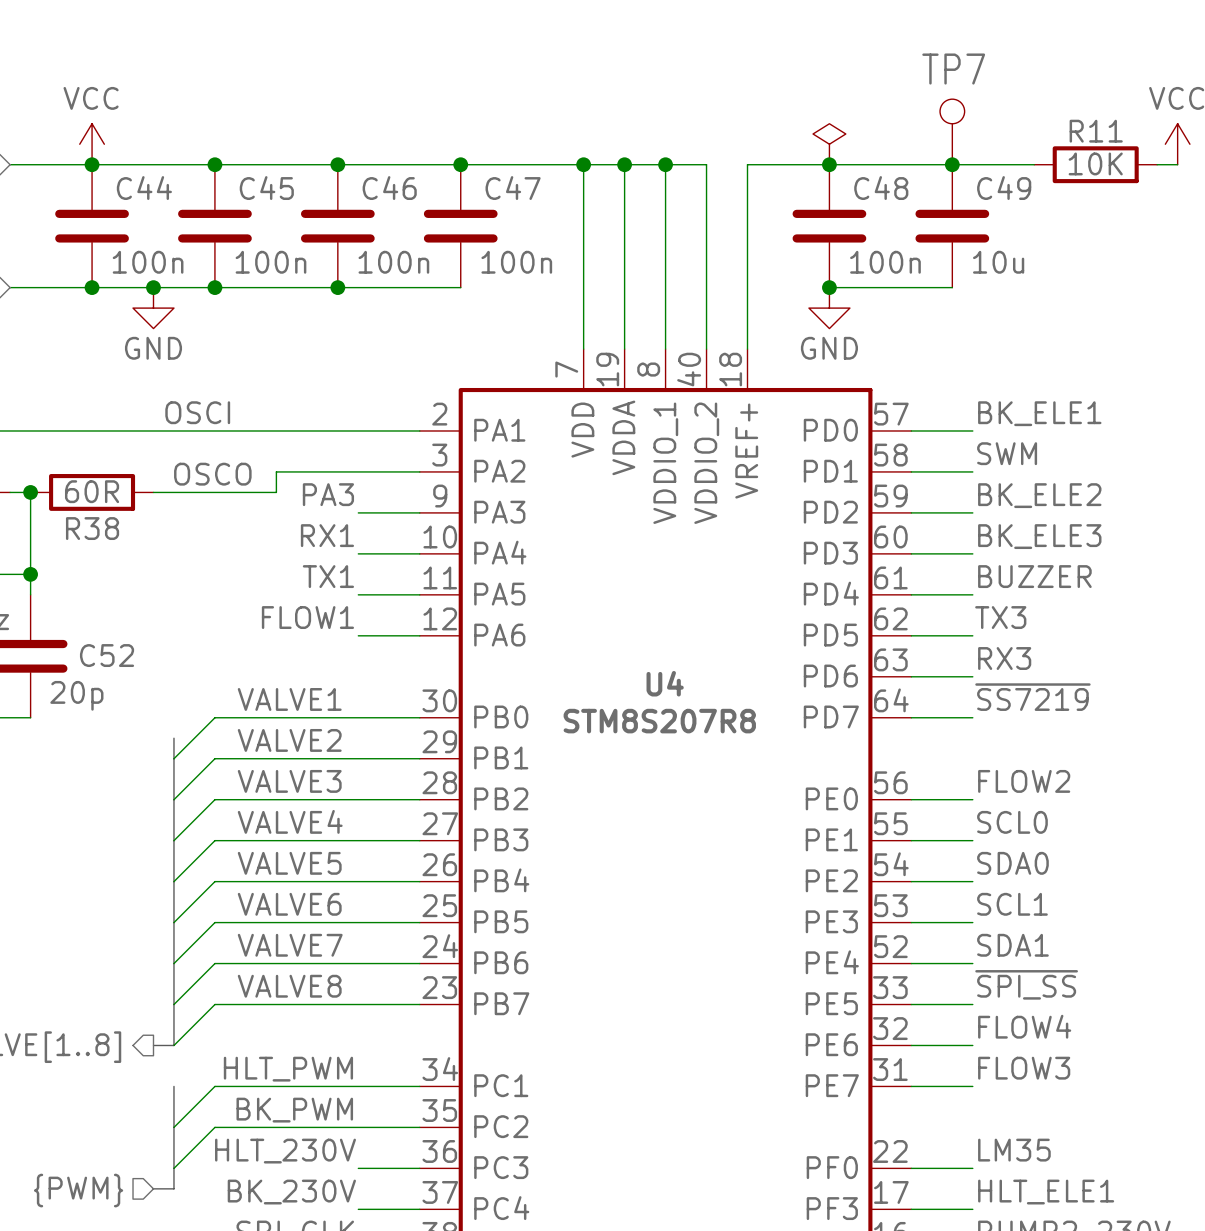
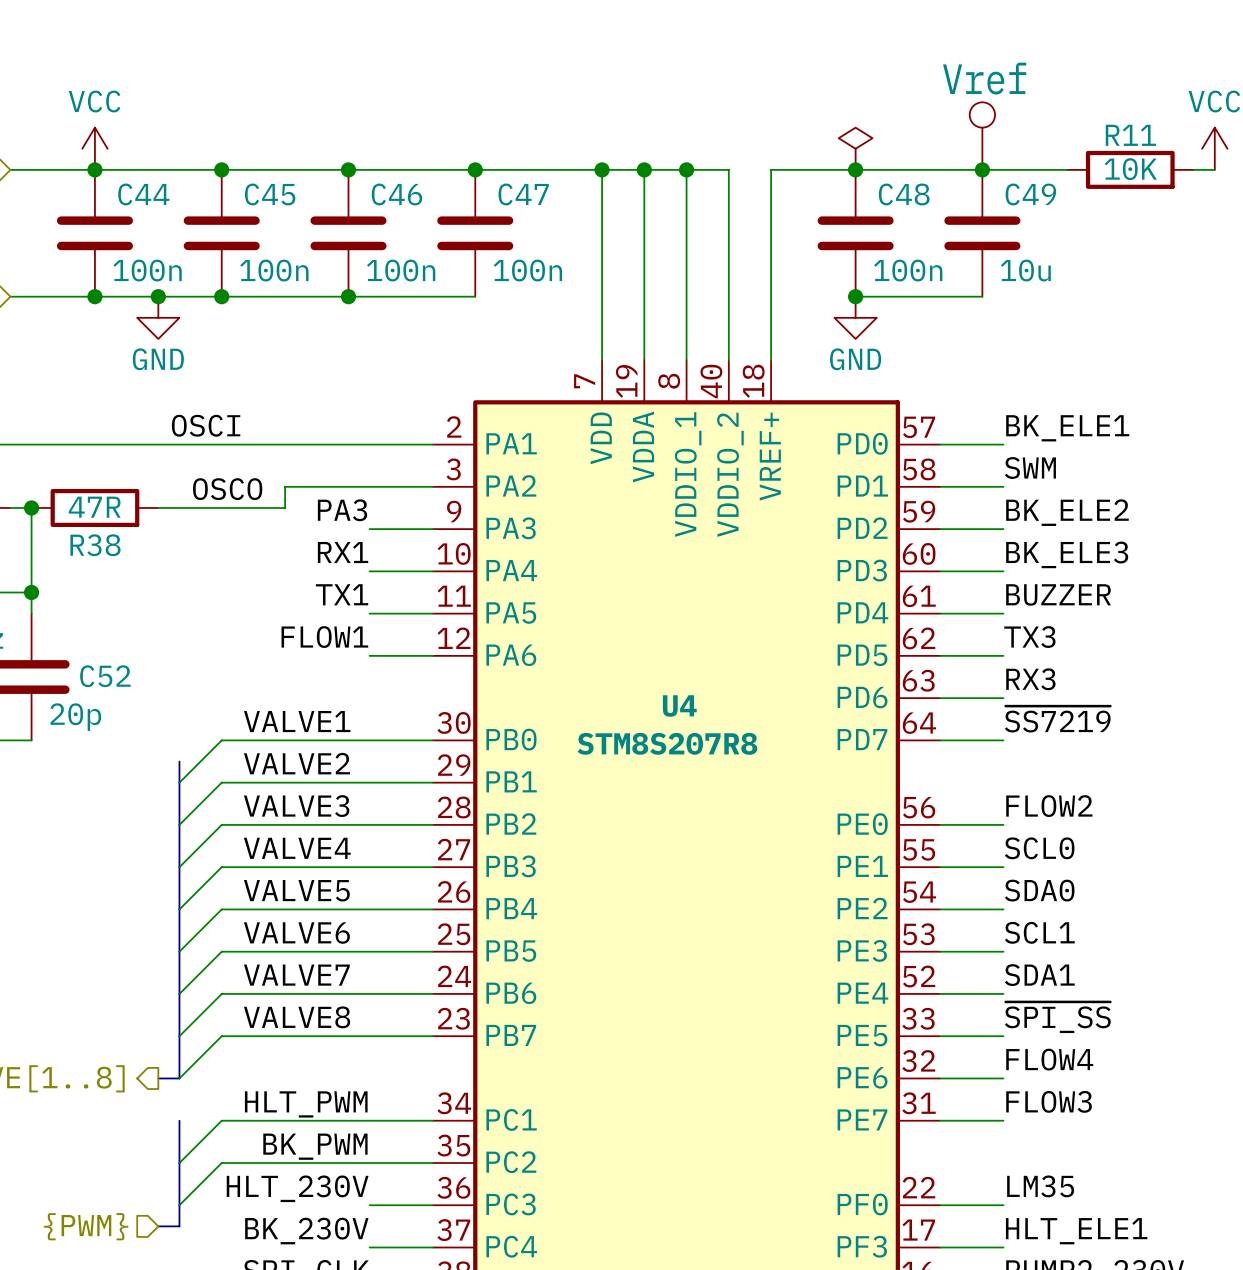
TP7 name: TP7 (953, 69) -> none
TP7 value: none -> Vref (984, 78)
R38 value: 60R (92, 491) -> 47R (94, 507)

